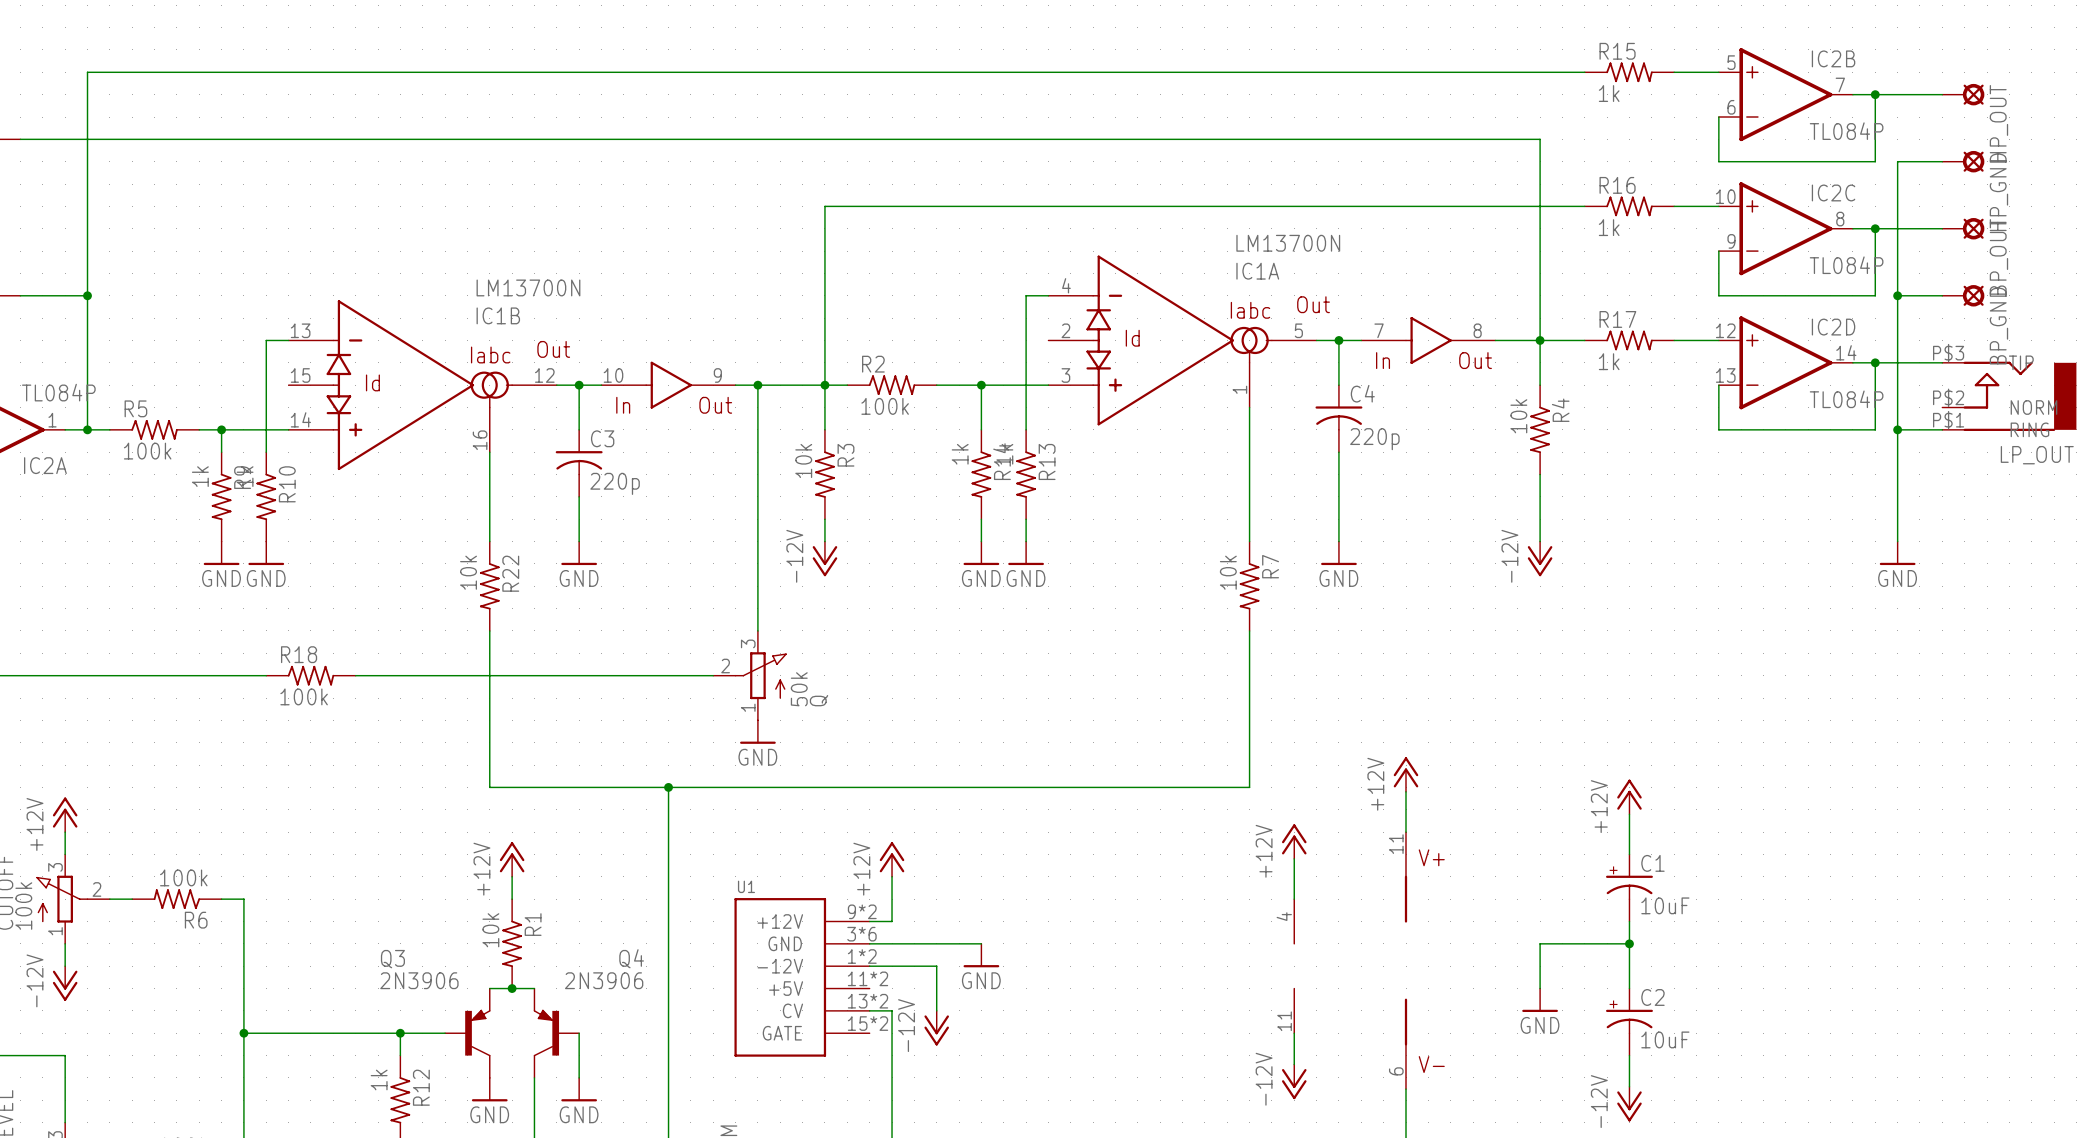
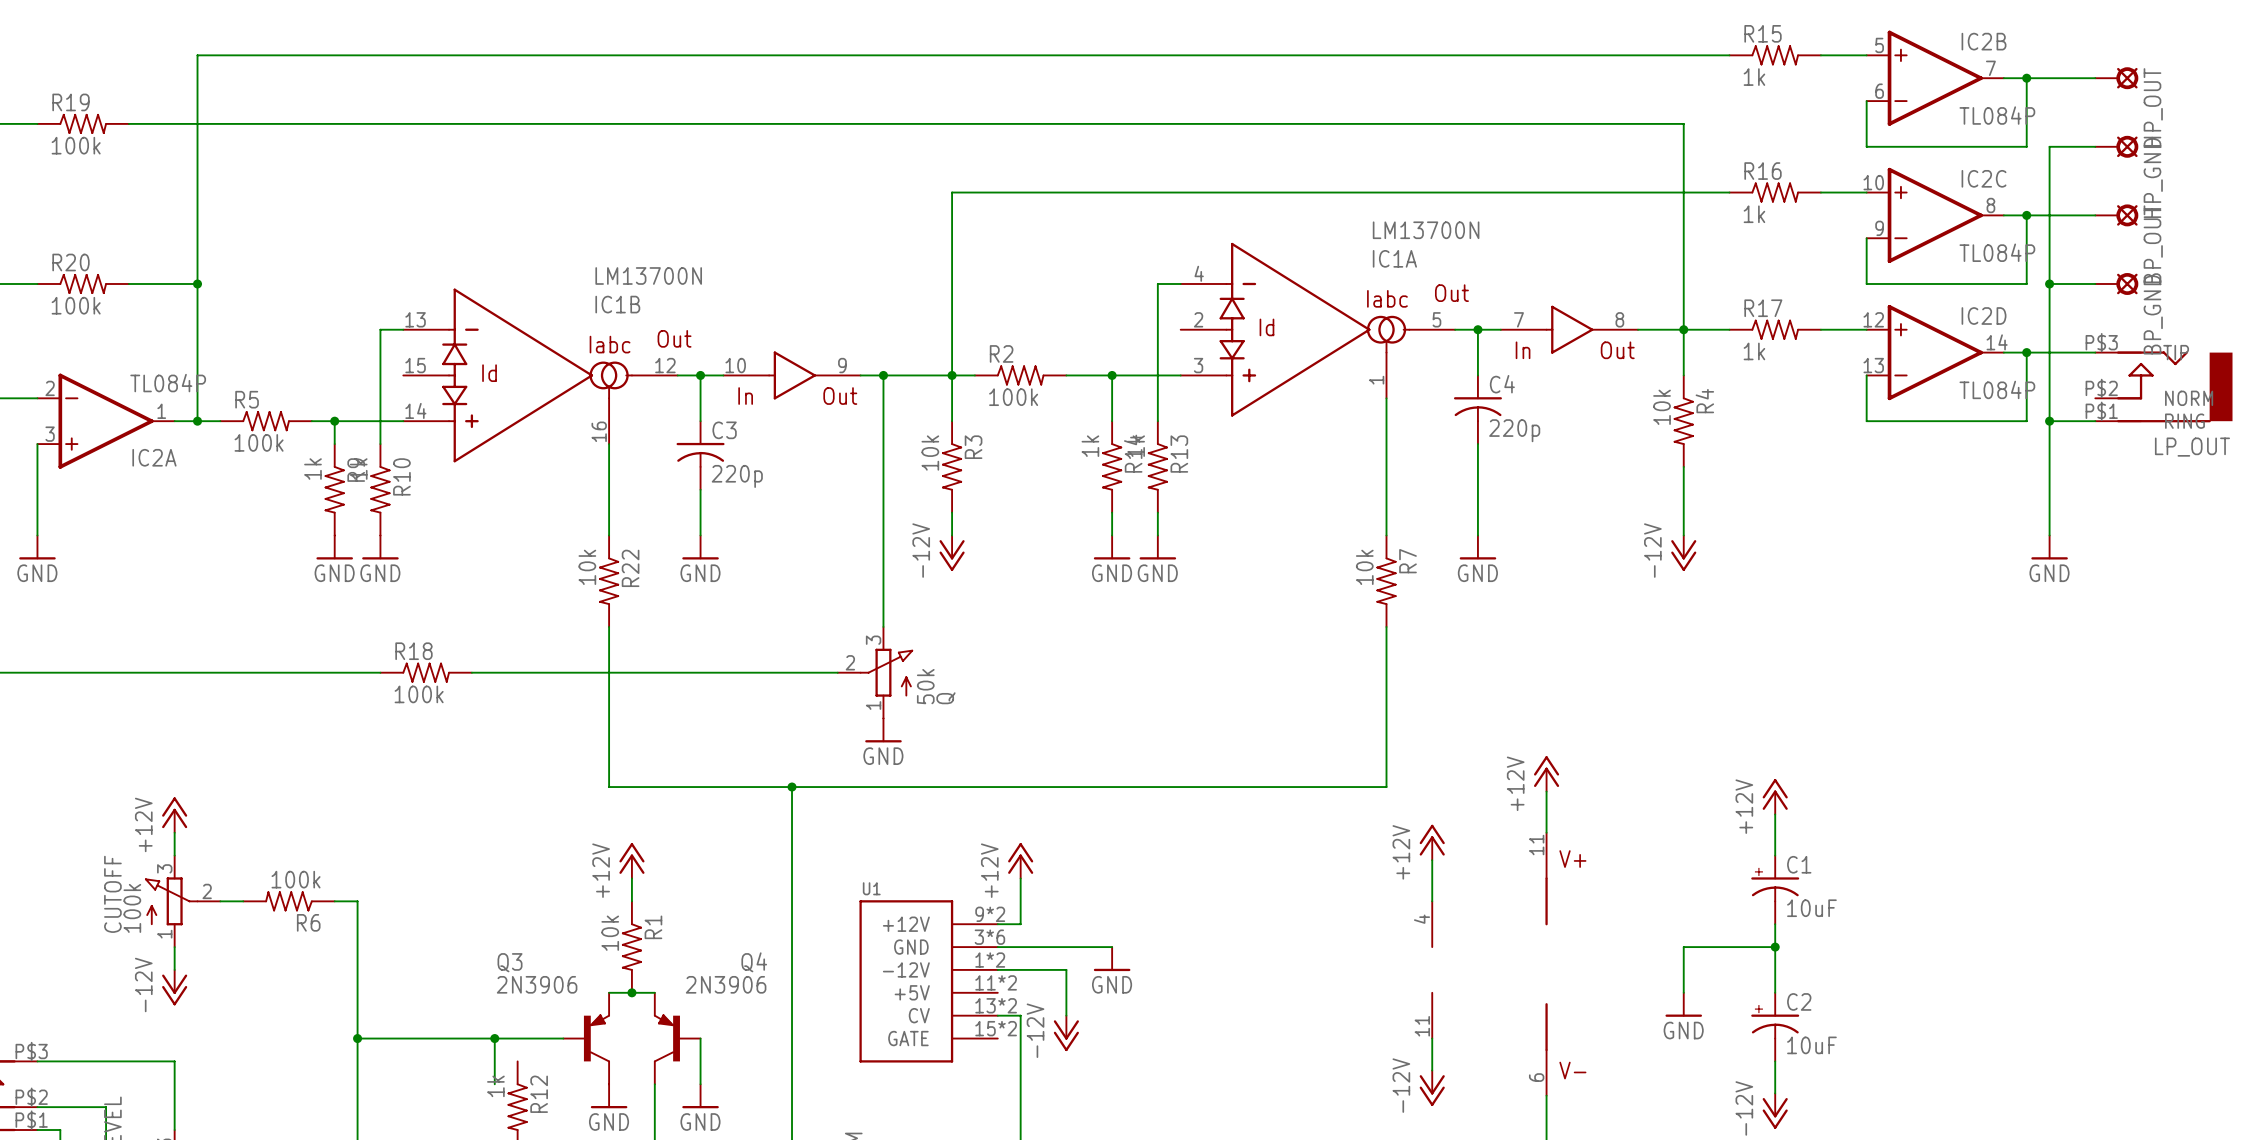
wire: none -> (494, 1038) (494, 1084)
wire: (400, 1033) (400, 1055) -> none
junction position: (400, 1033) -> (494, 1038)

